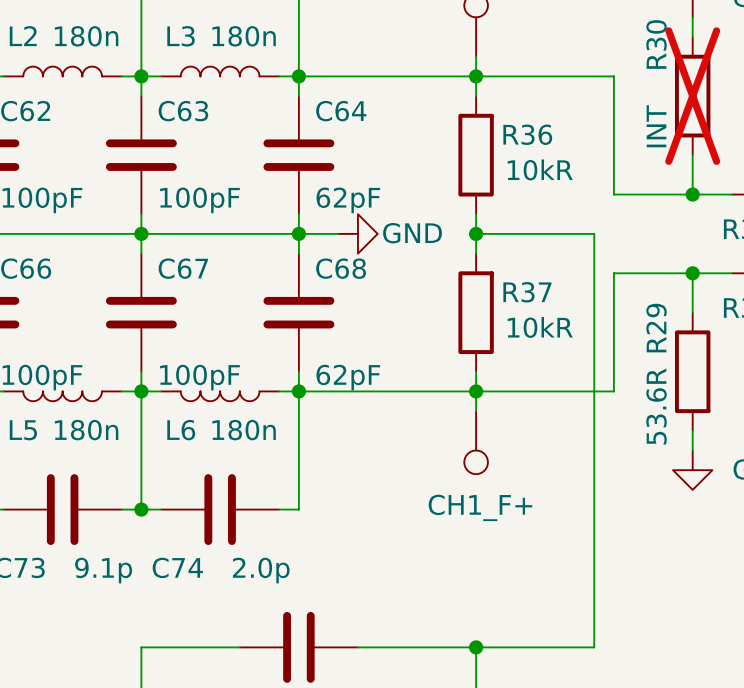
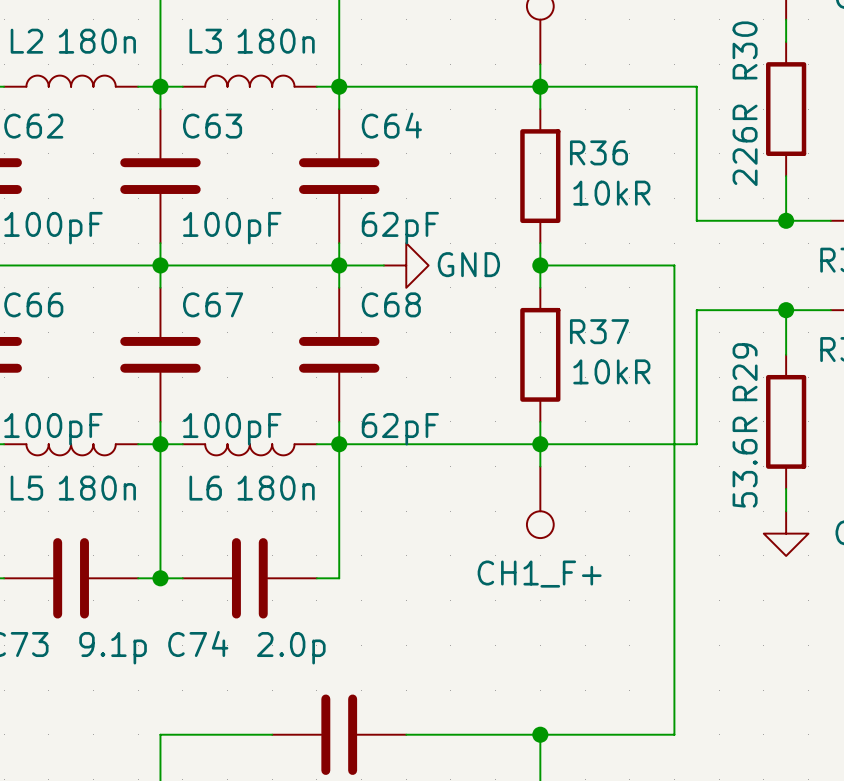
R30 do-not-place cross: (692, 96) -> none
R30 value: INT (656, 126) -> 226R (745, 145)

